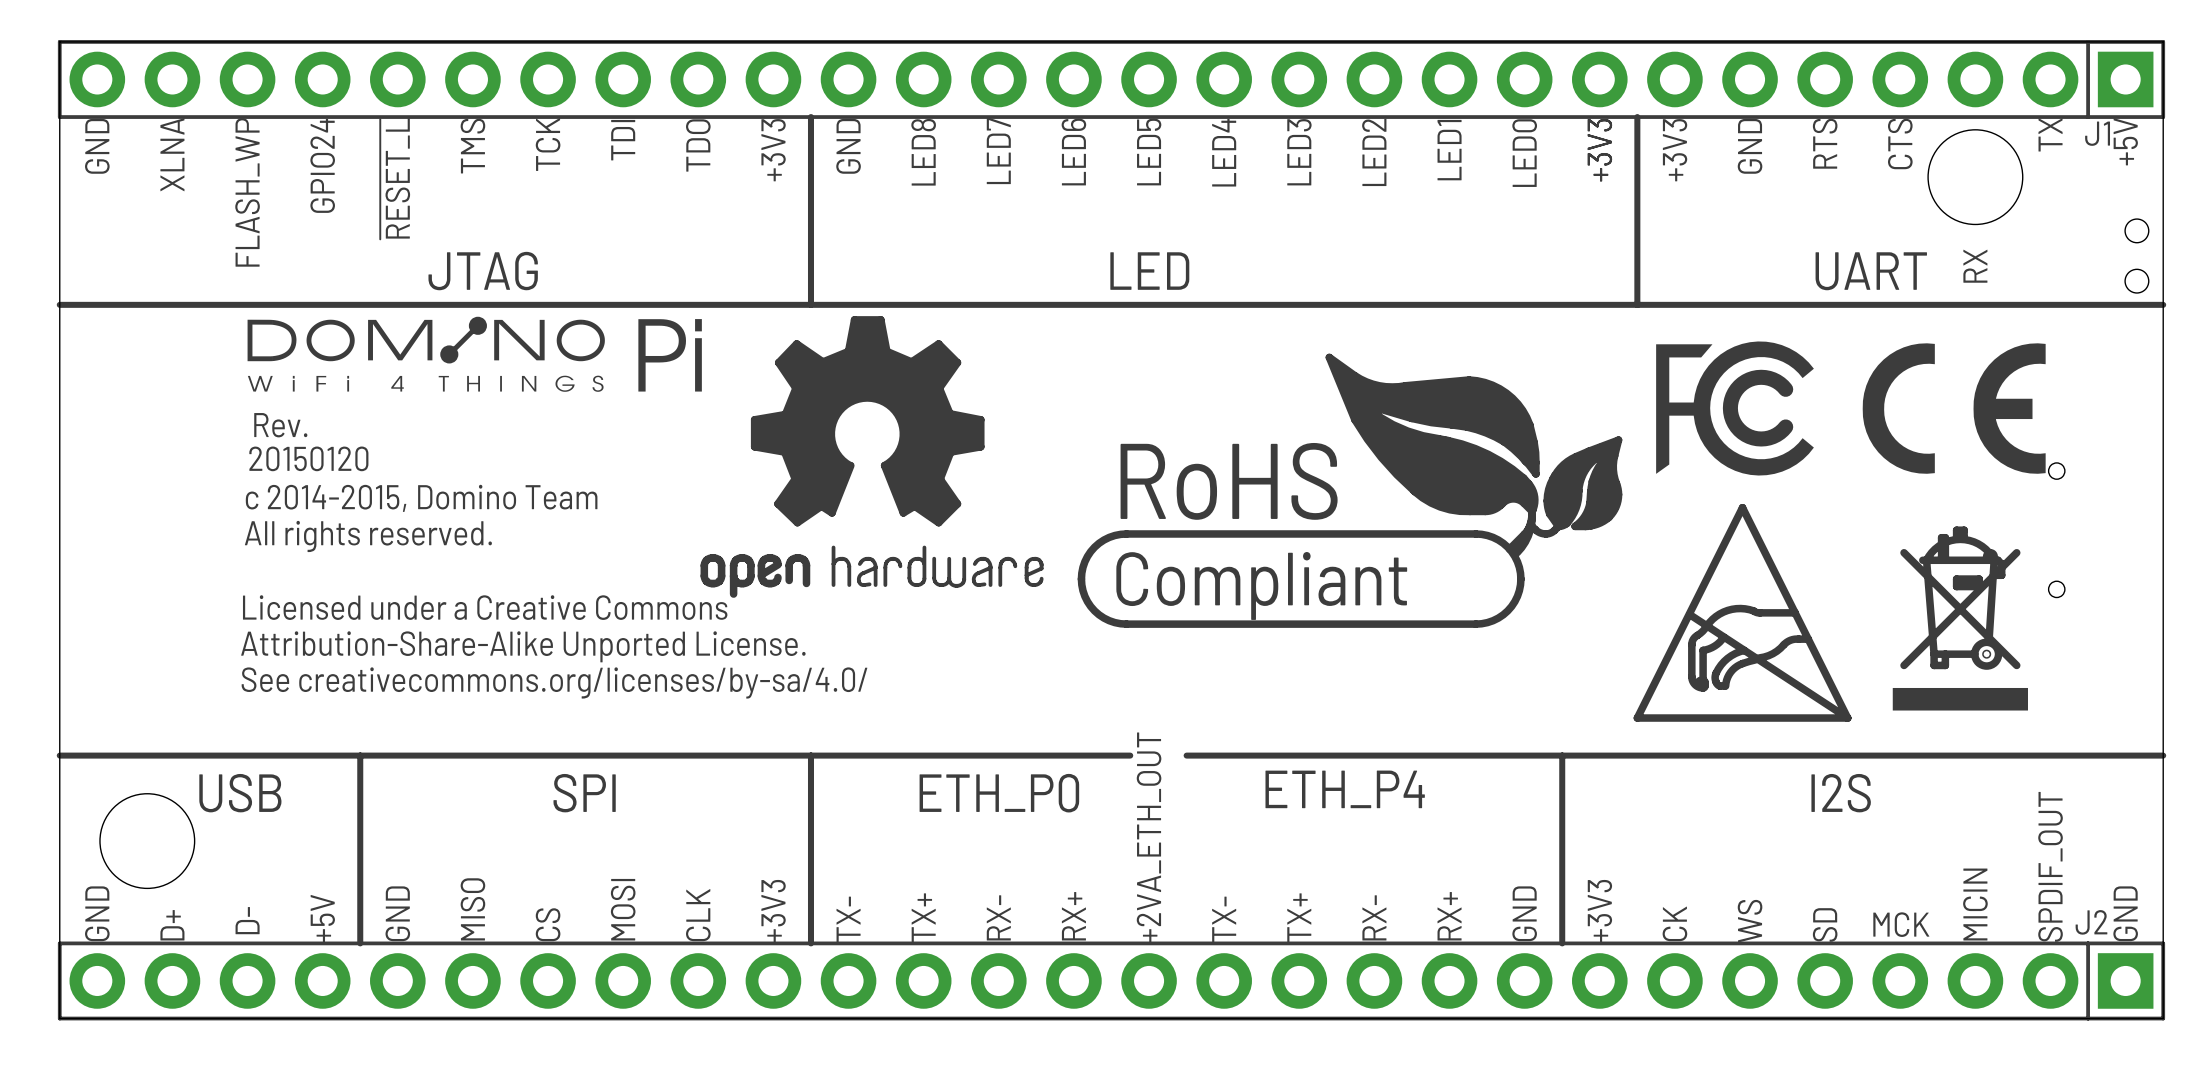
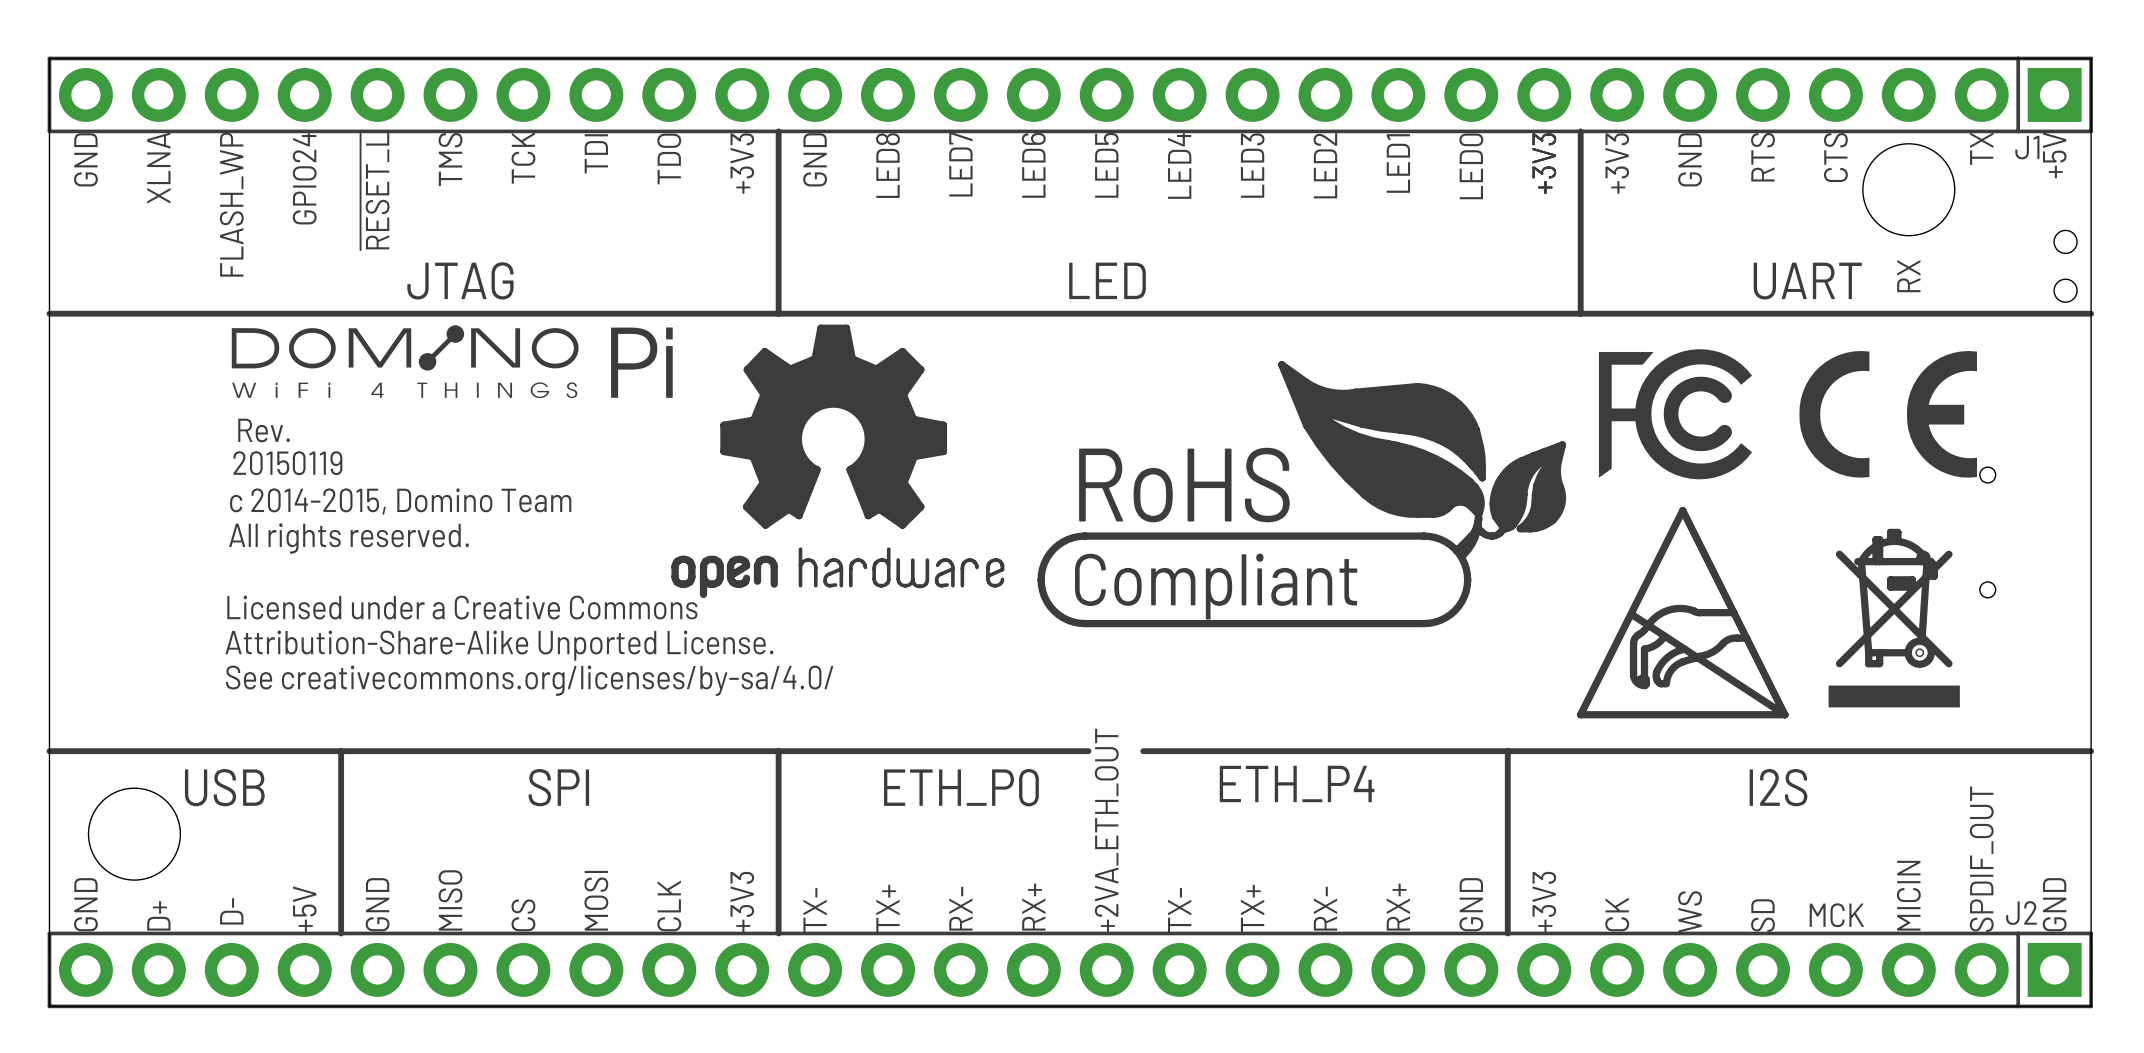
text: 20150120 (308, 458) -> 20150119 (287, 463)

